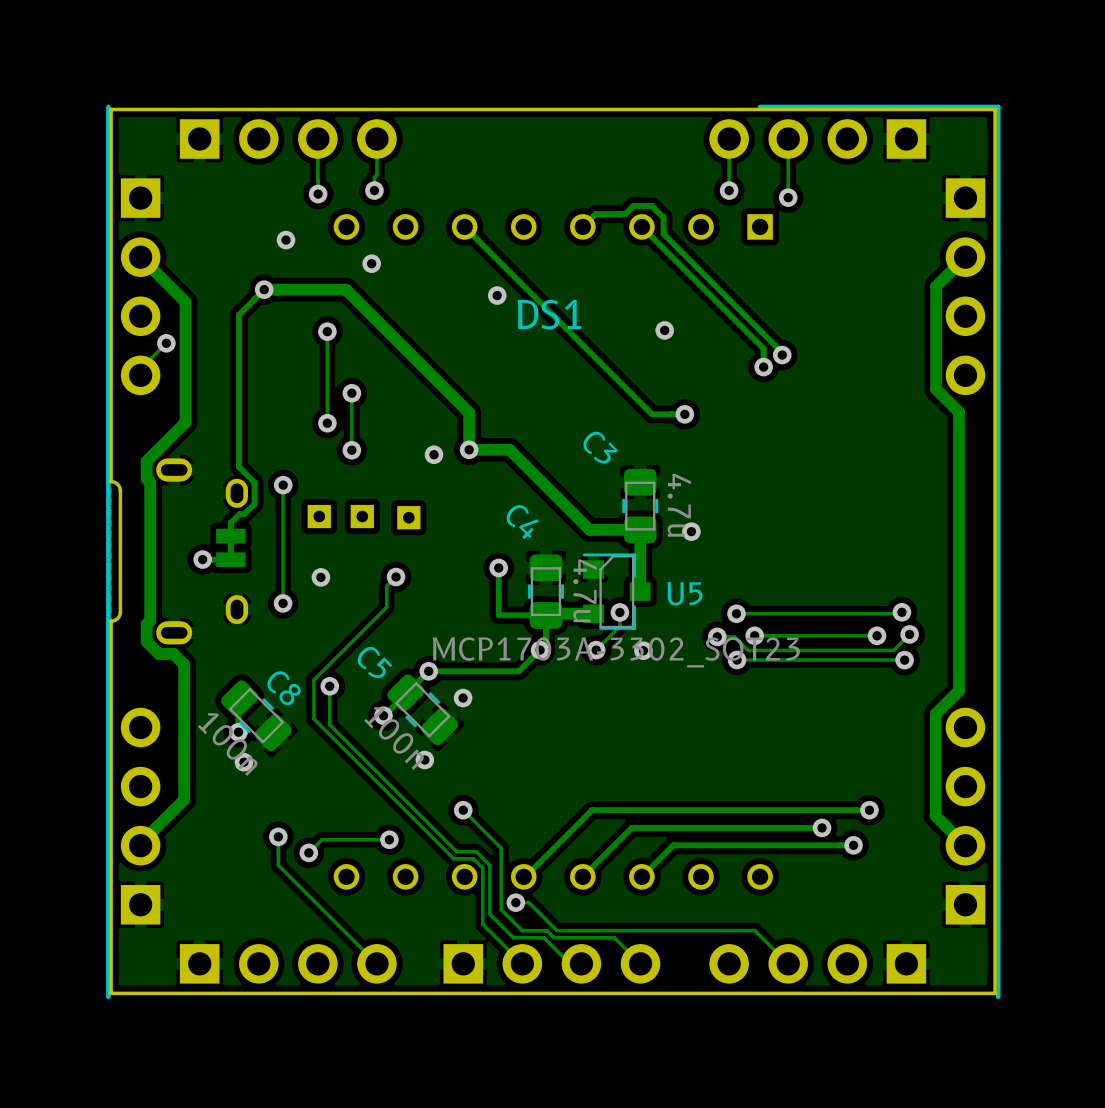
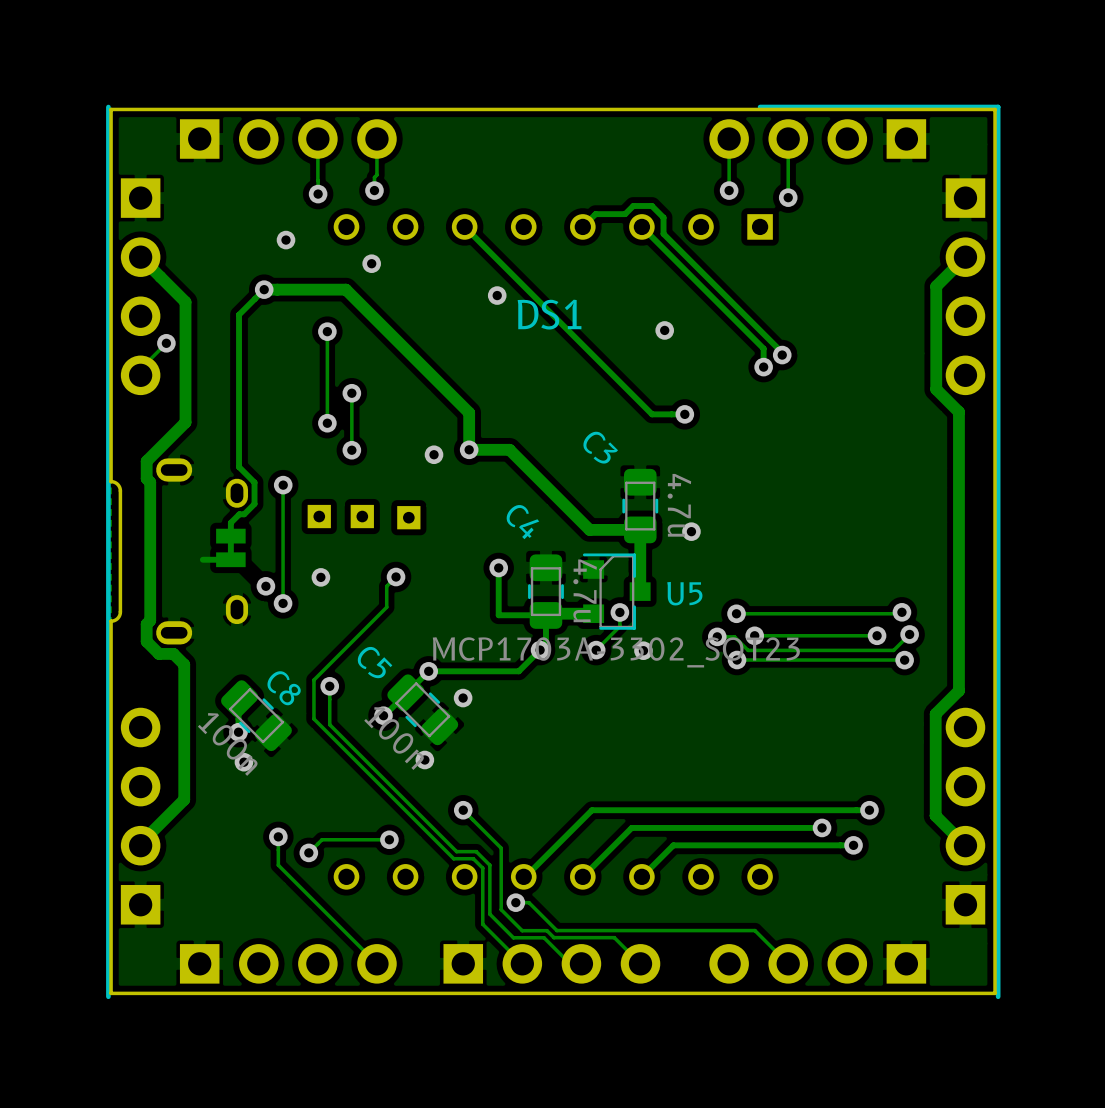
via position: (202, 559) -> (265, 586)

